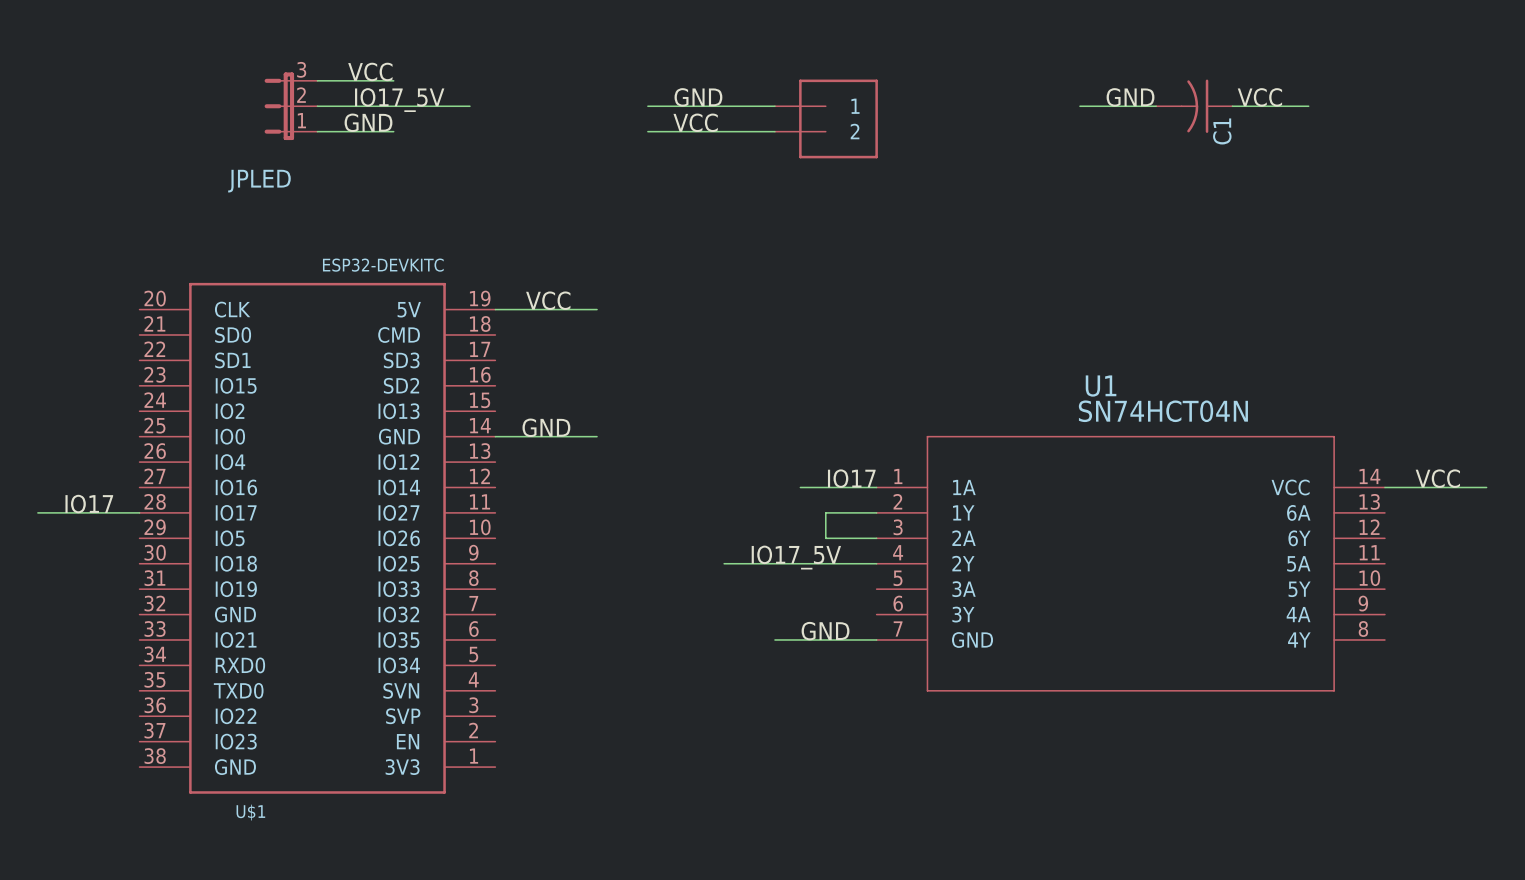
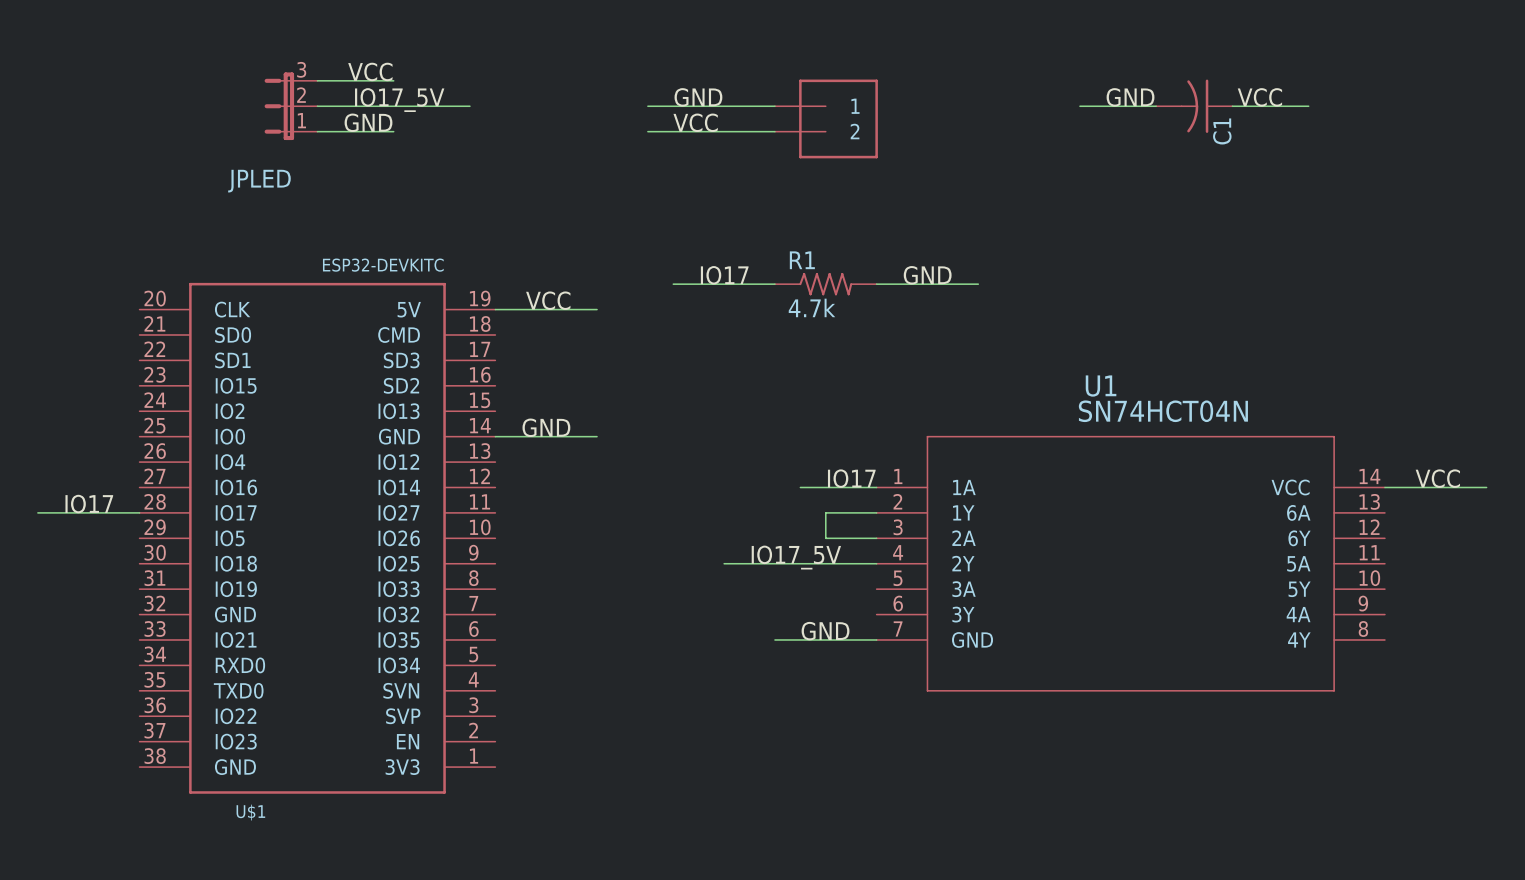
label: none -> IO17 (724, 275)
label: none -> GND (927, 275)
wire: none -> (673, 284) (774, 284)
R1: none -> 4.7k (825, 284)
wire: none -> (876, 284) (978, 284)

